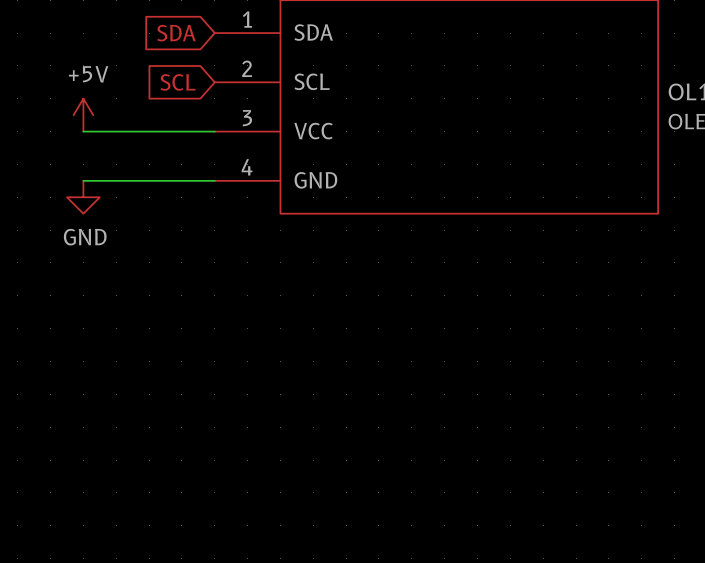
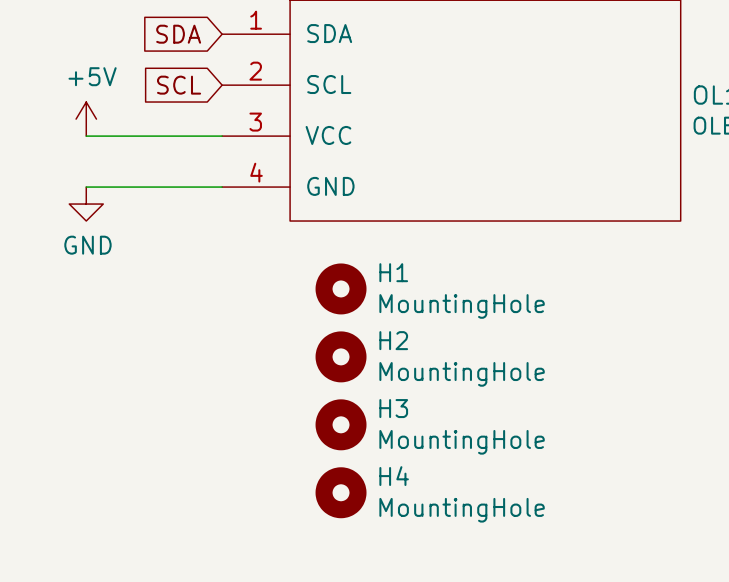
H1: none -> MountingHole (341, 288)
H2: none -> MountingHole (341, 356)
H3: none -> MountingHole (341, 424)
H4: none -> MountingHole (341, 492)

